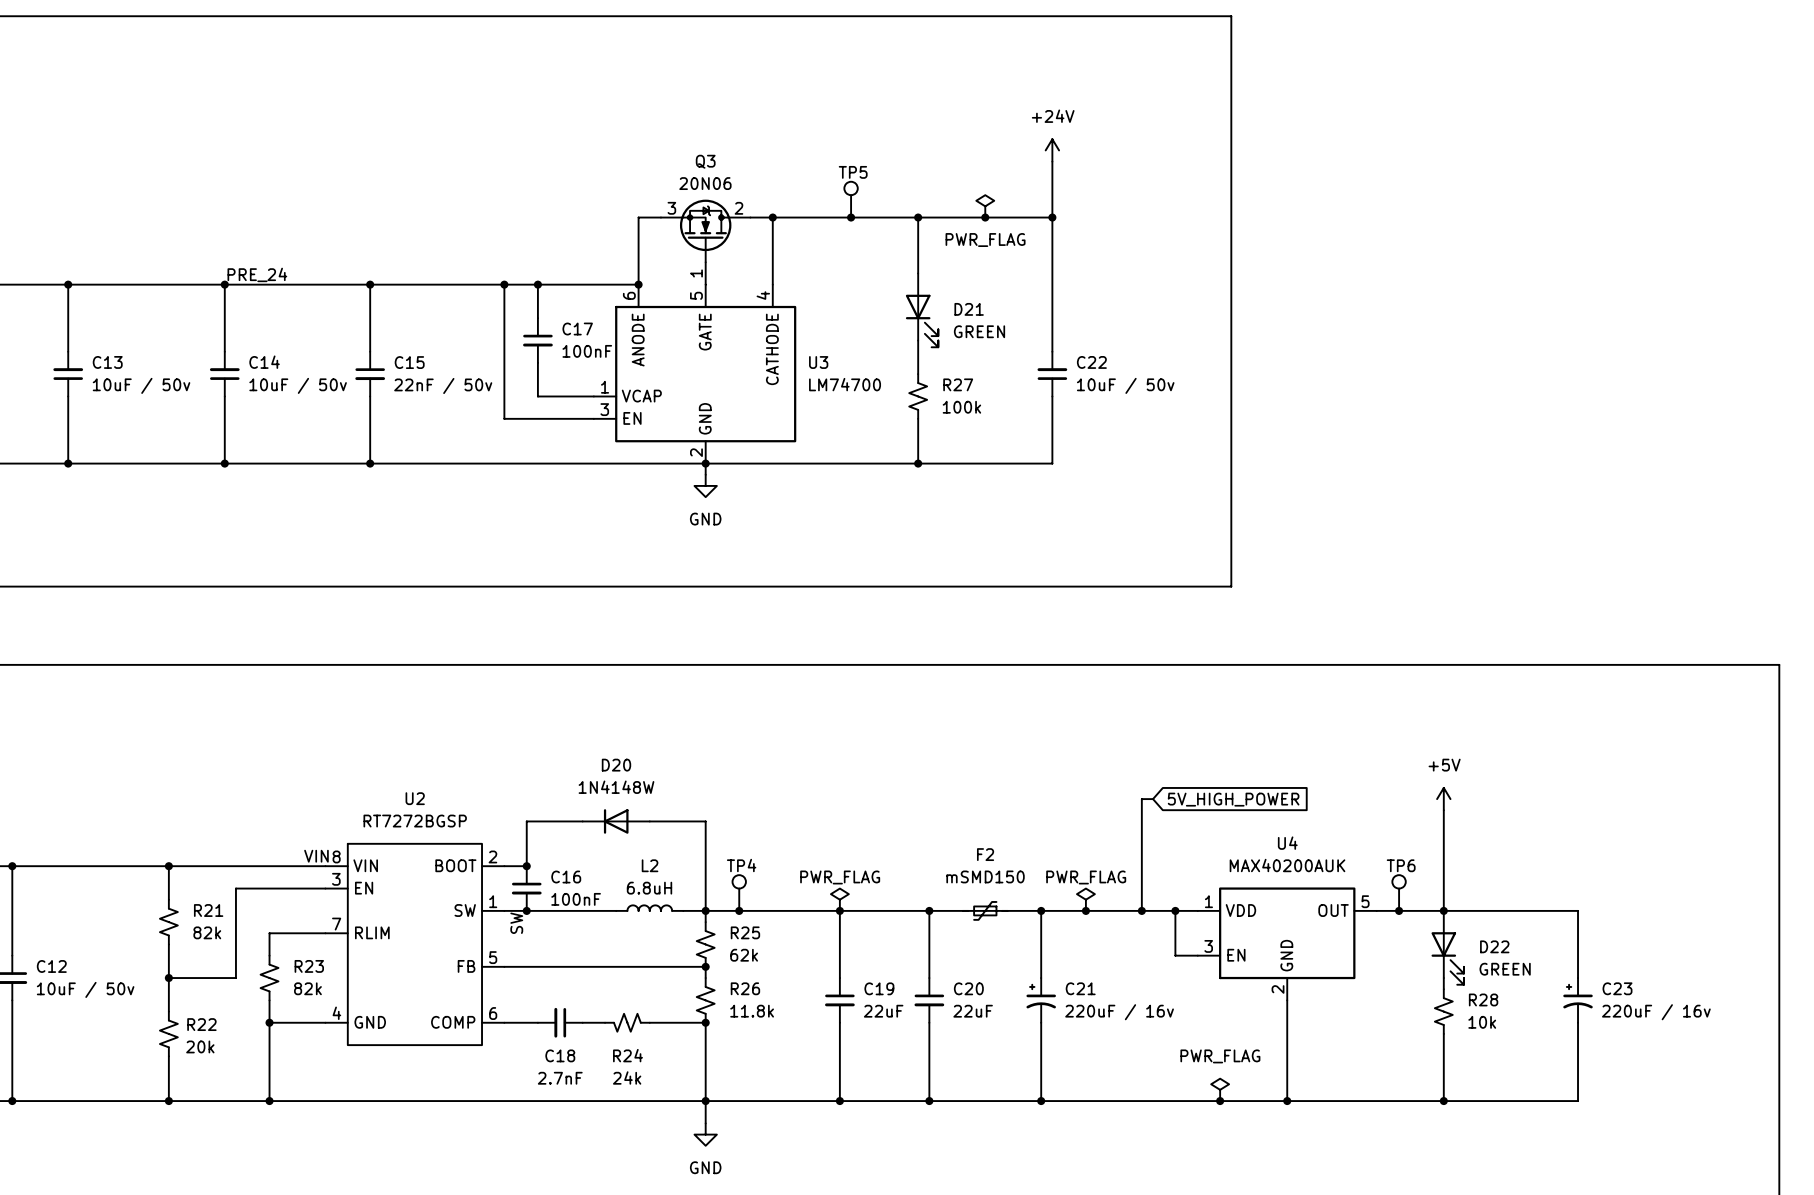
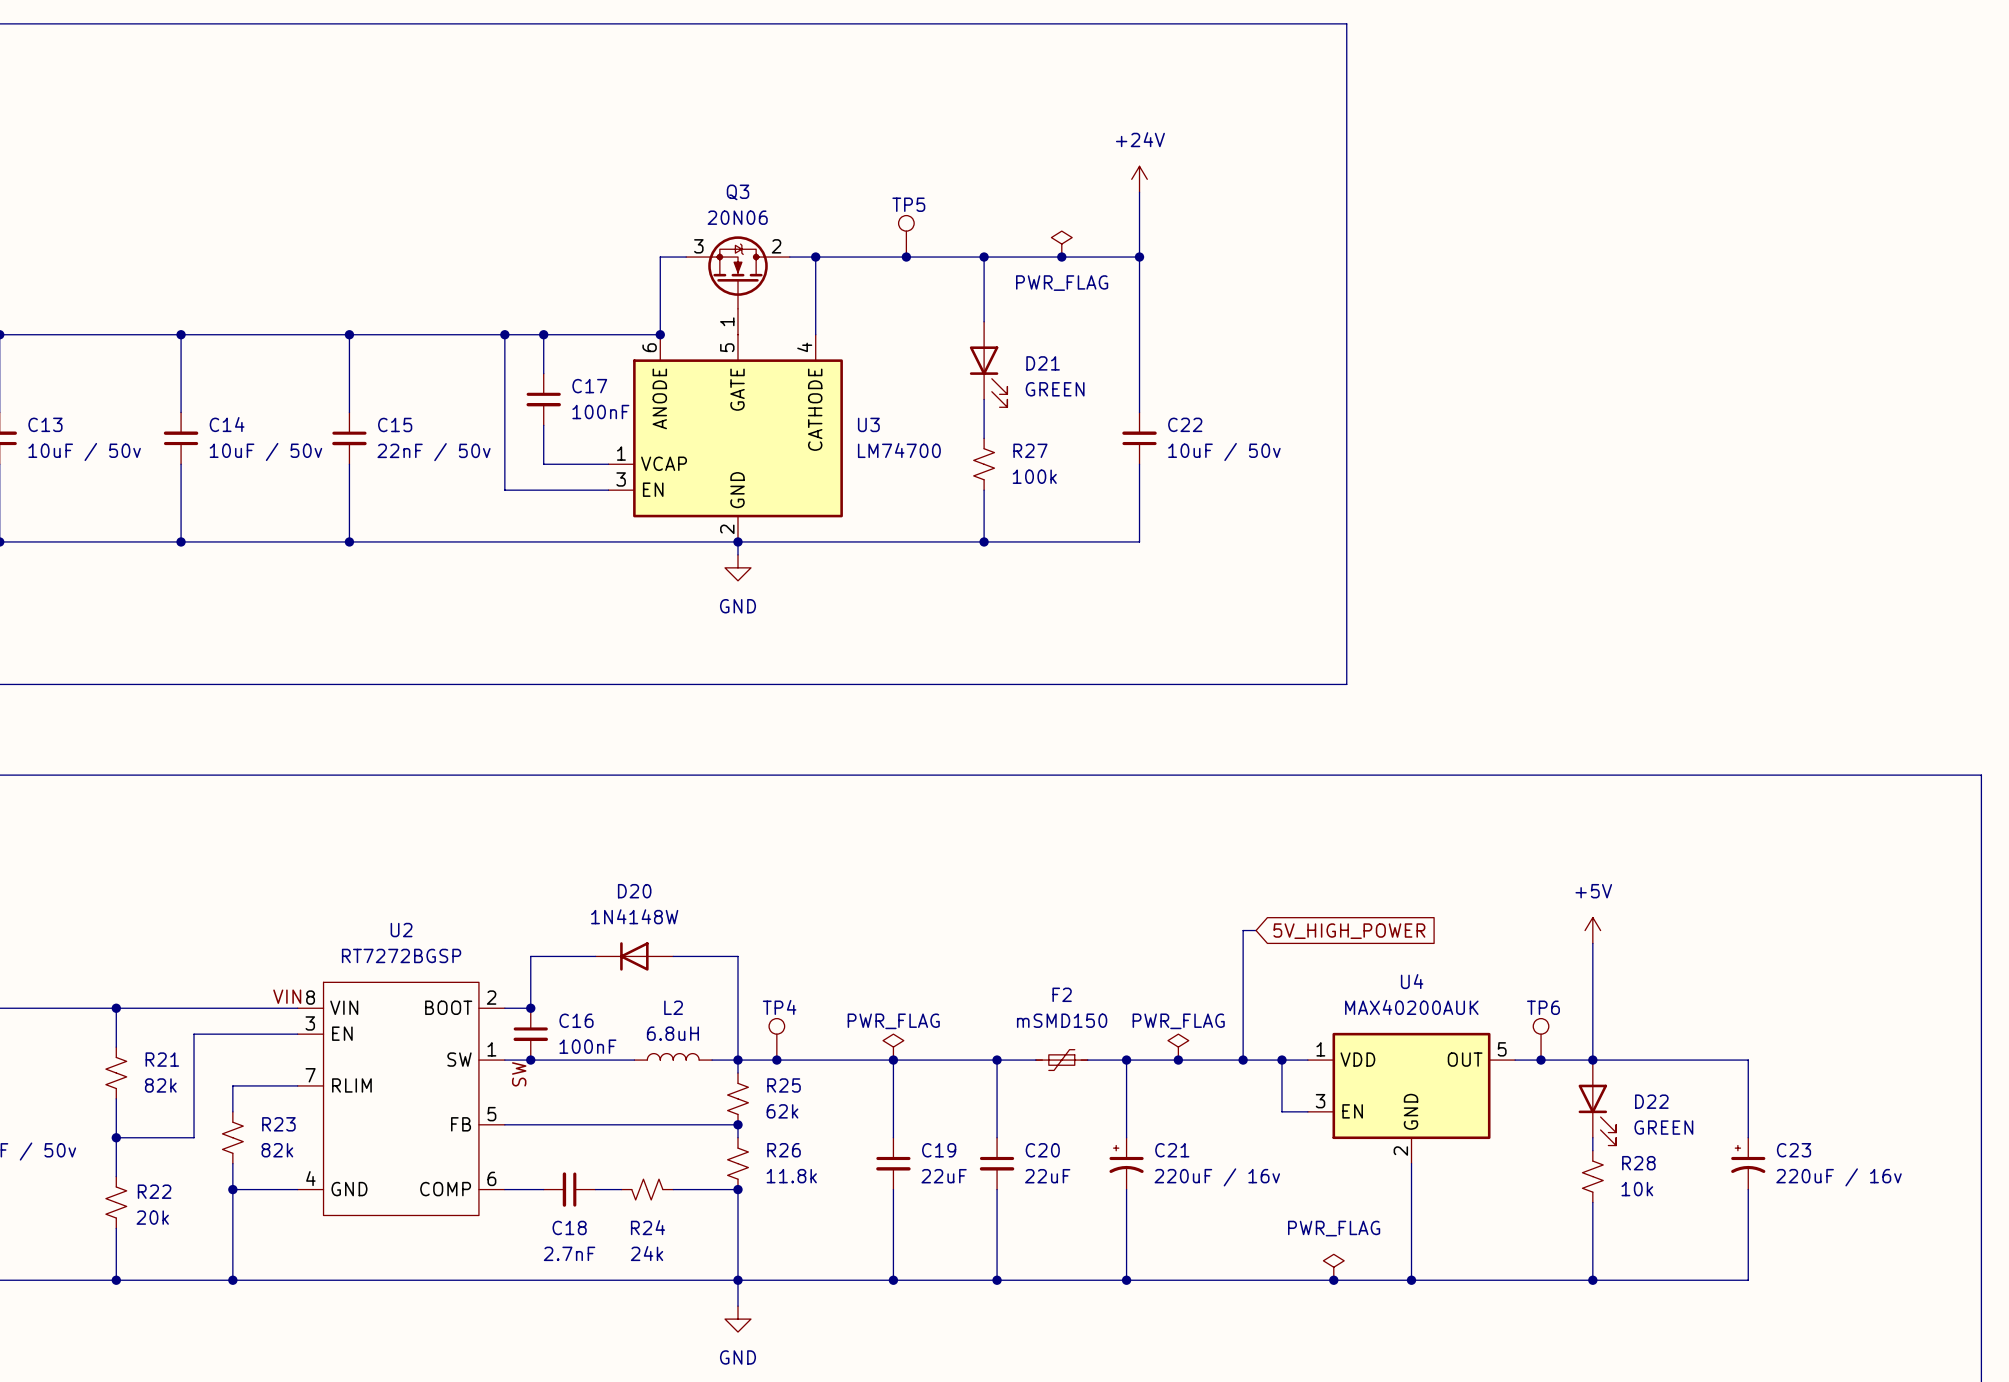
label: PRE_24 (257, 274) -> none

